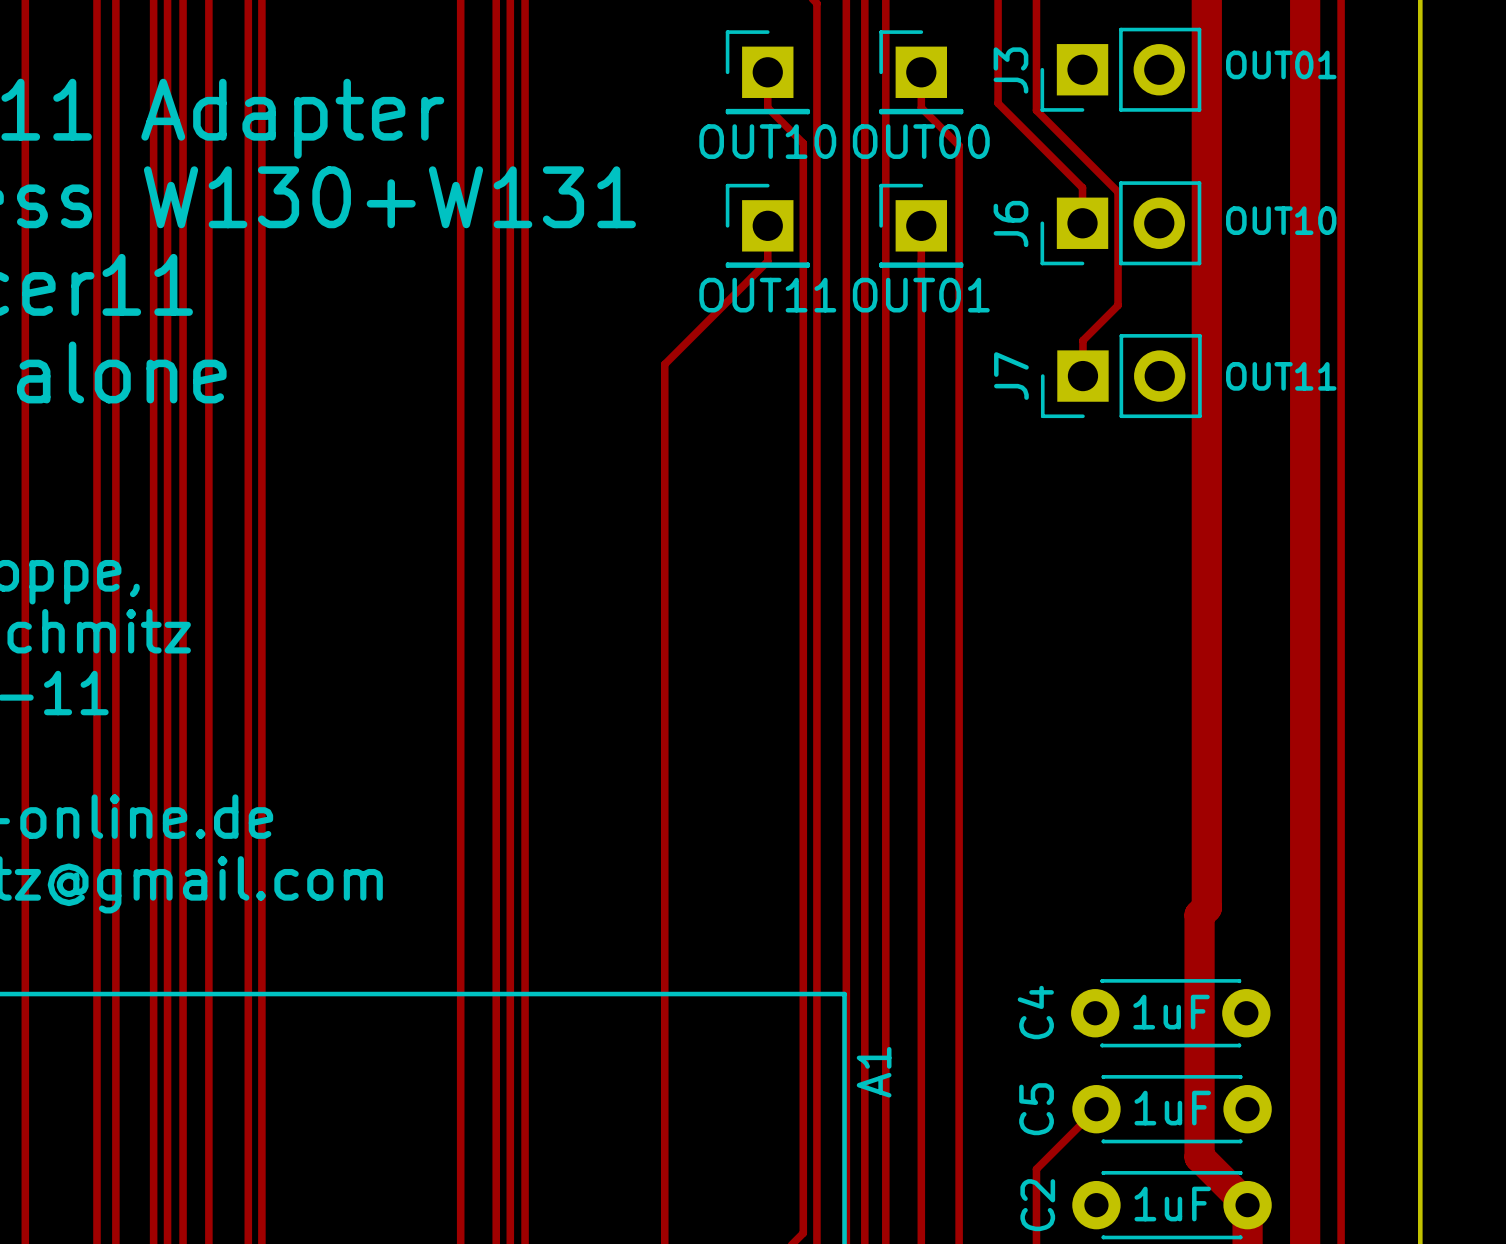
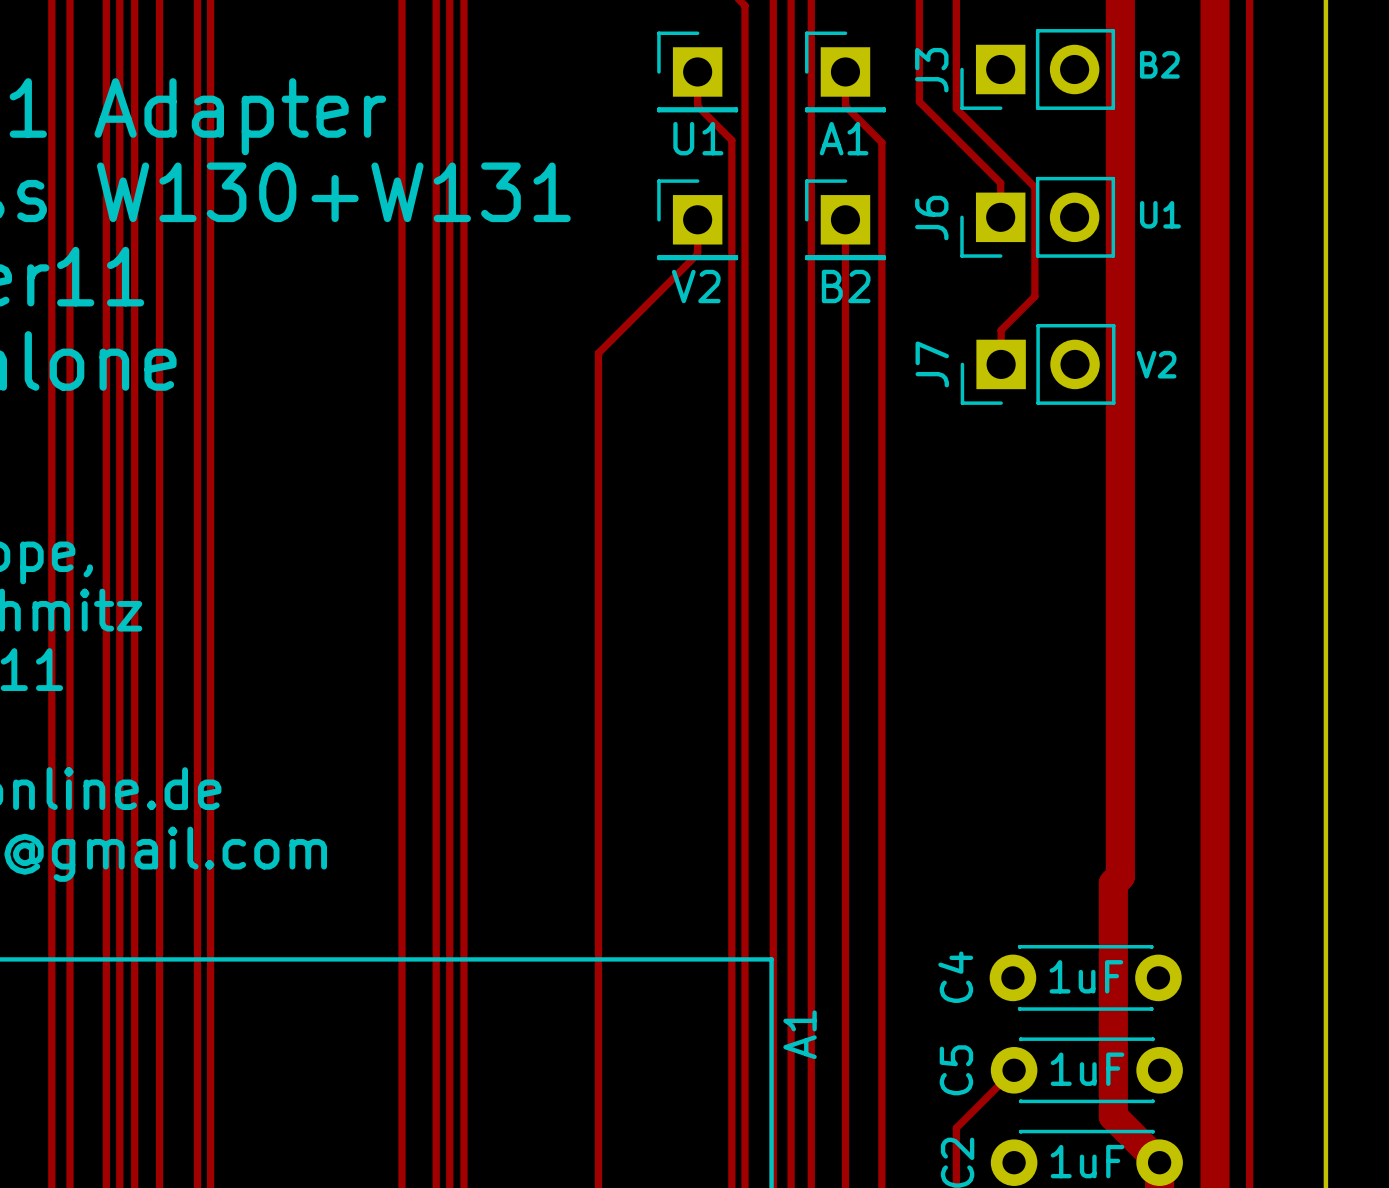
text: OUT01 (1281, 64) -> B2 (1159, 64)
part value: OUT10 (767, 141) -> U1 (698, 138)
part value: OUT00 (921, 141) -> A1 (844, 138)
text: OUT10 (1281, 220) -> U1 (1160, 214)
part value: OUT11 (767, 295) -> V2 (696, 286)
part value: OUT01 (921, 295) -> B2 (846, 286)
text: OUT11 (1281, 376) -> V2 (1156, 364)

